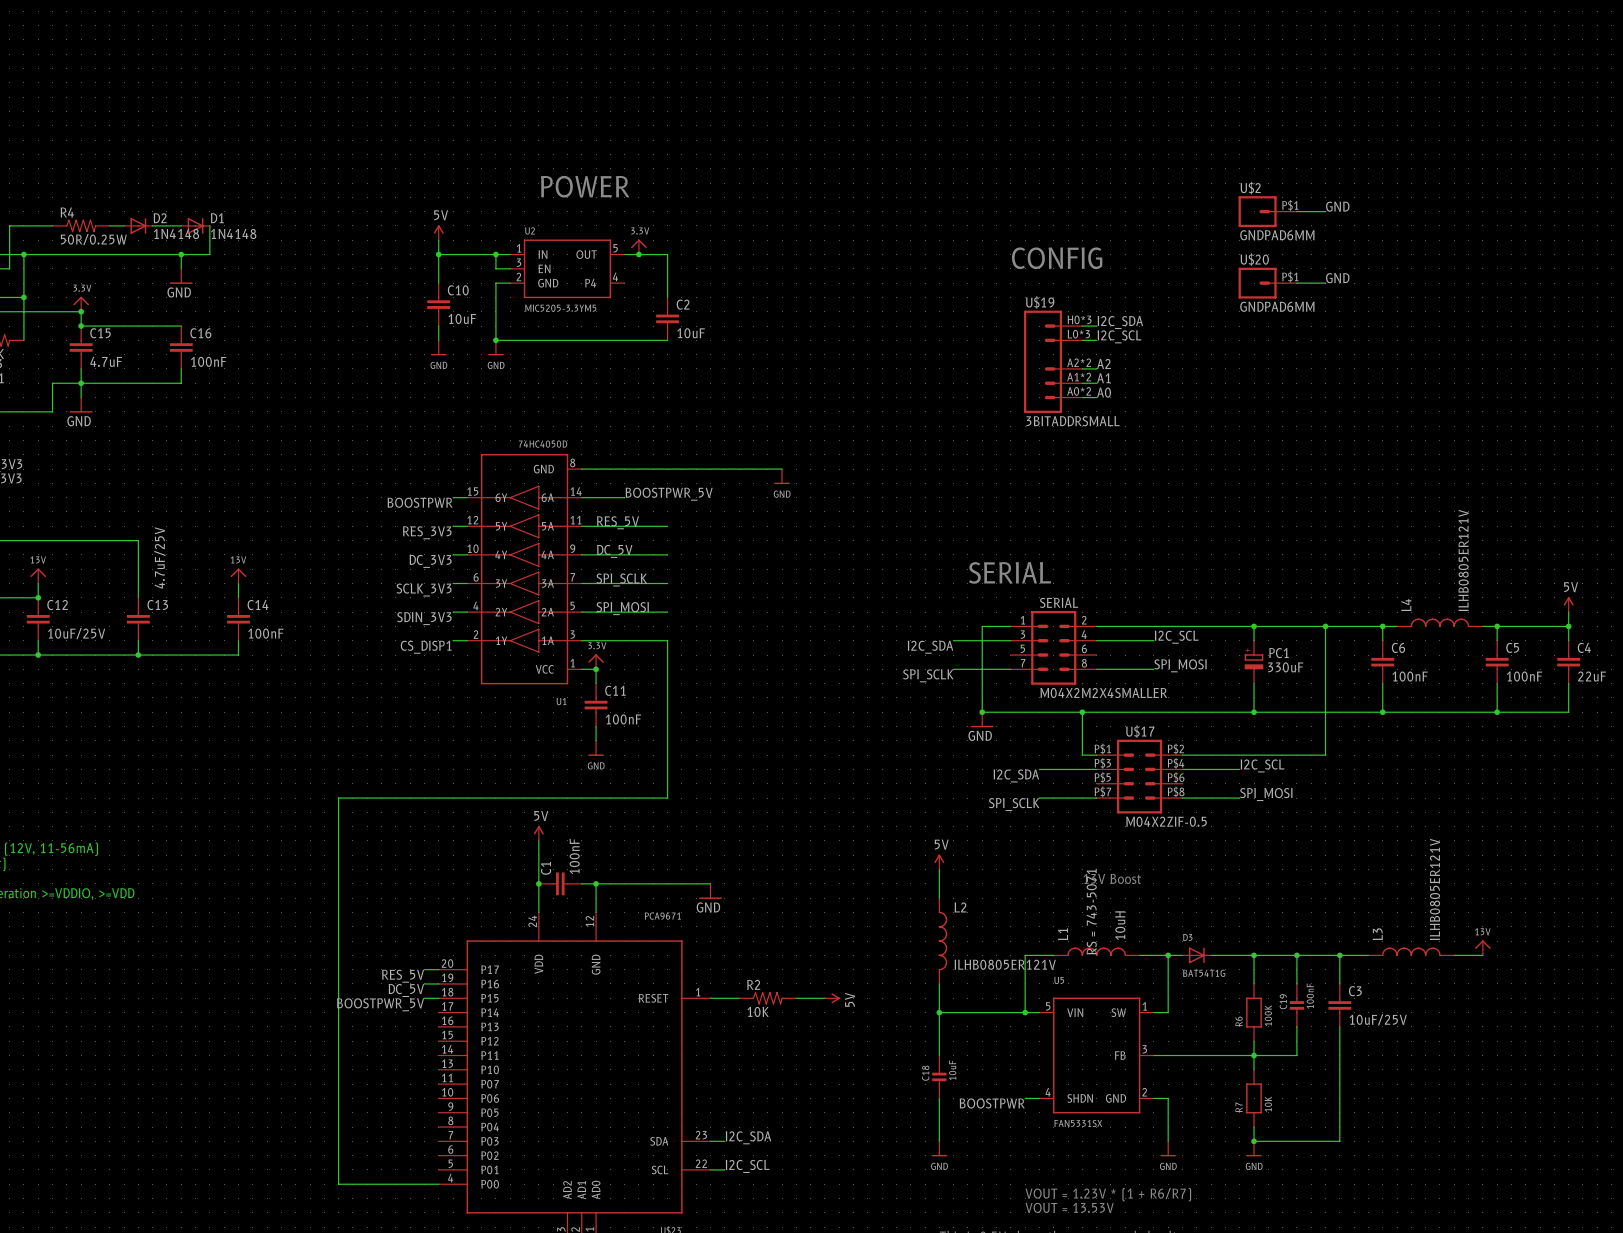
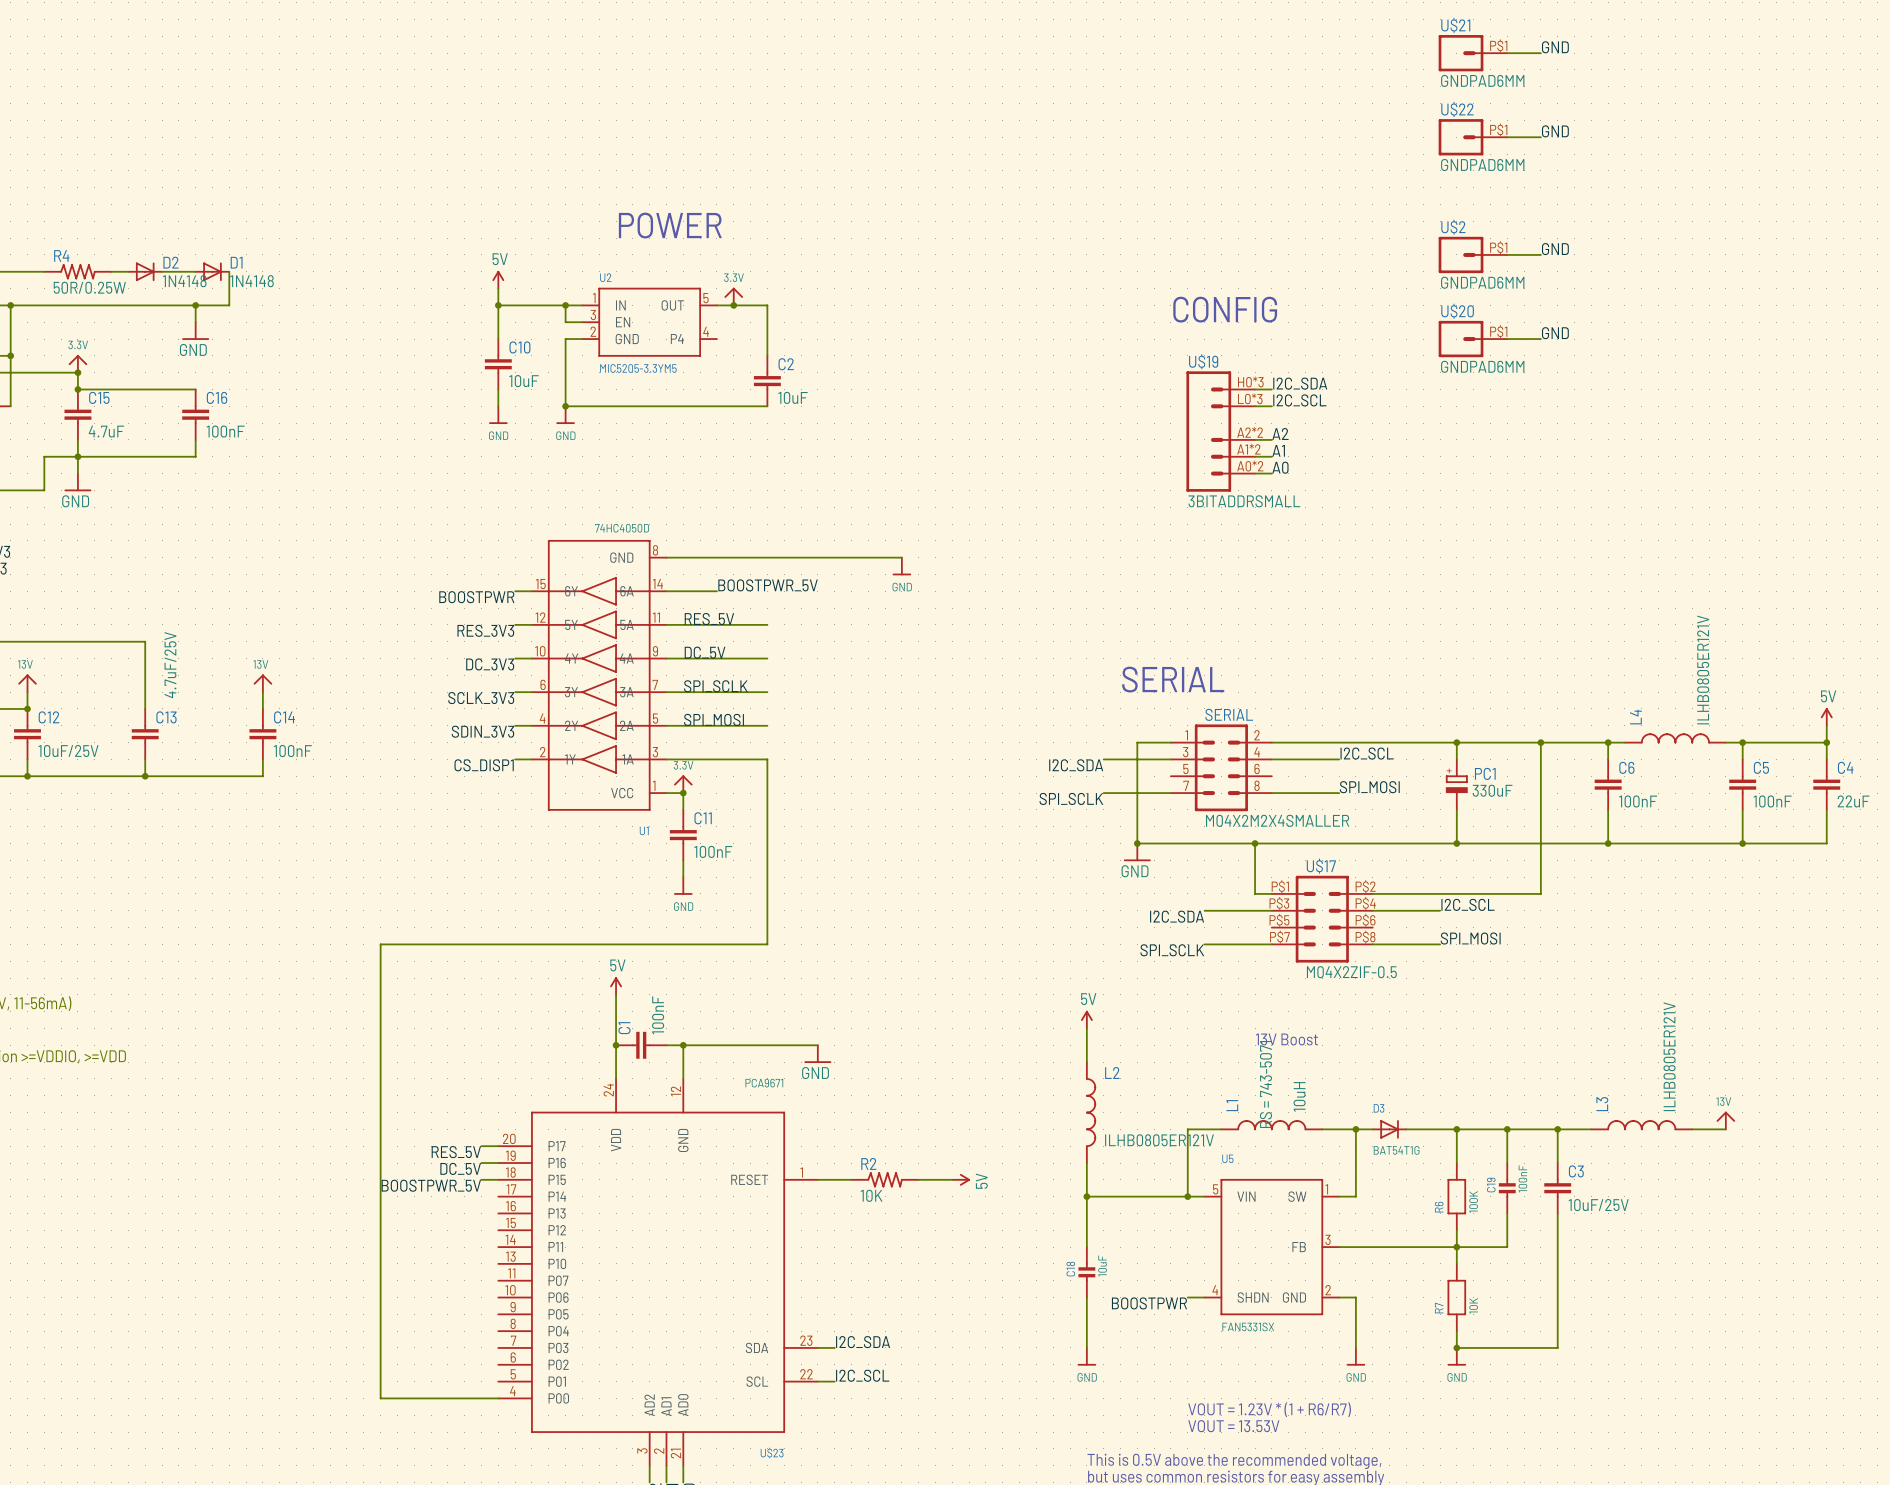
label: none -> GND (1555, 47)
U$21: none -> GNDPAD6MM (1472, 53)
wire: none -> (1507, 53) (1540, 53)
label: none -> GND (1555, 131)
U$22: none -> GNDPAD6MM (1472, 137)
wire: none -> (1507, 137) (1540, 137)

